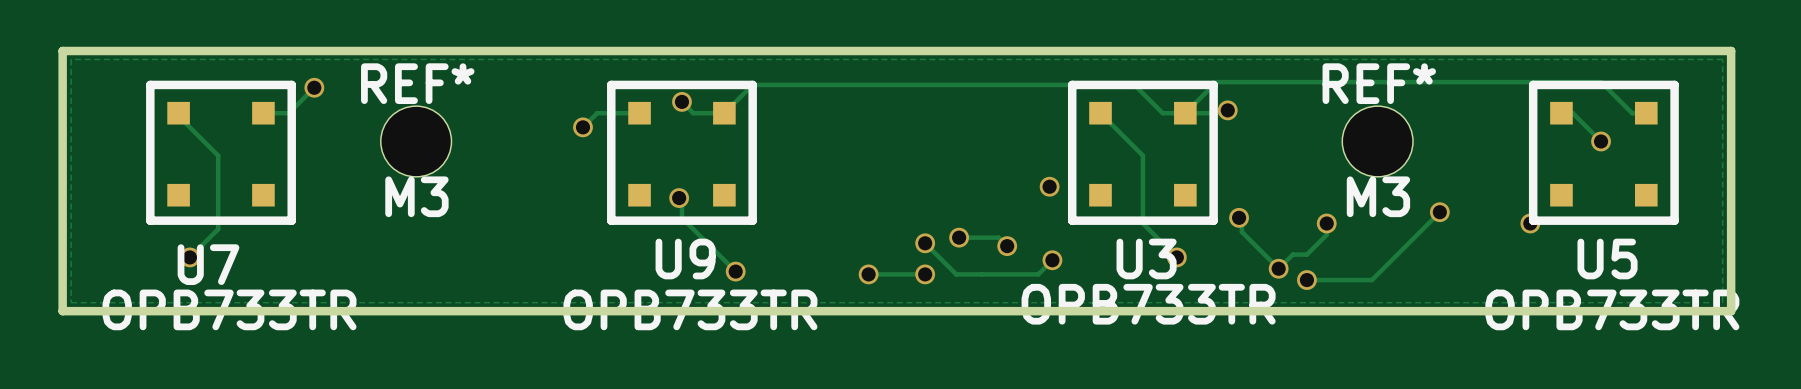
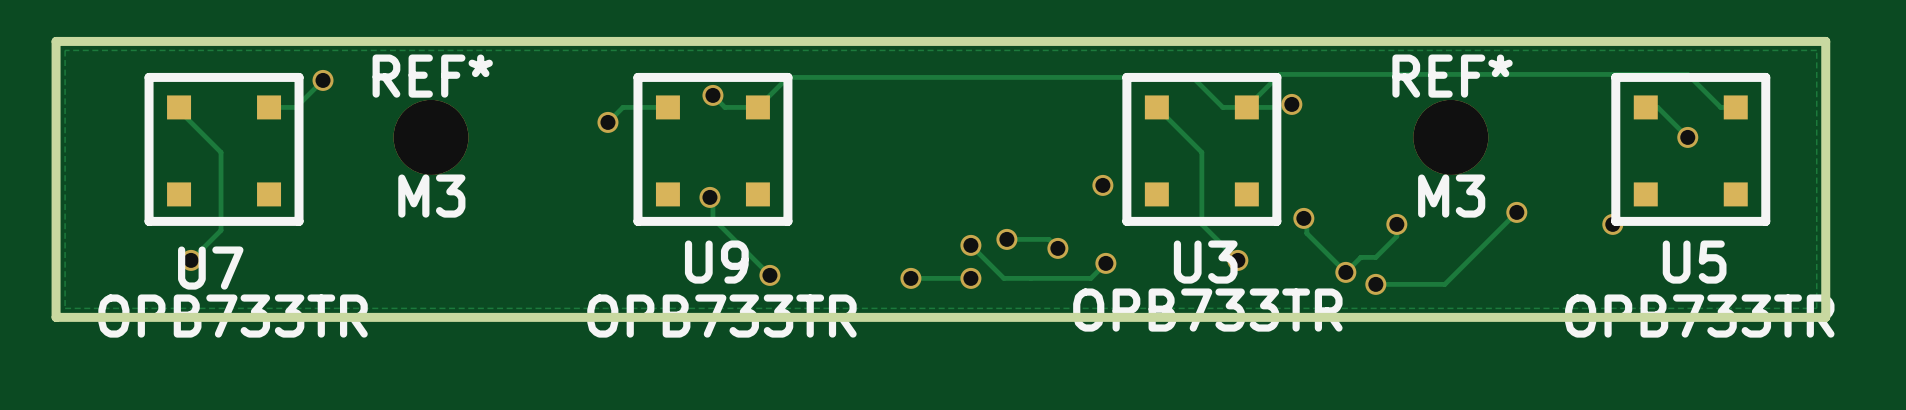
REF* footprint: [380, 106, 452, 177] -> [393, 99, 469, 175]
REF* footprint: [1342, 106, 1413, 177] -> [1413, 99, 1489, 175]

